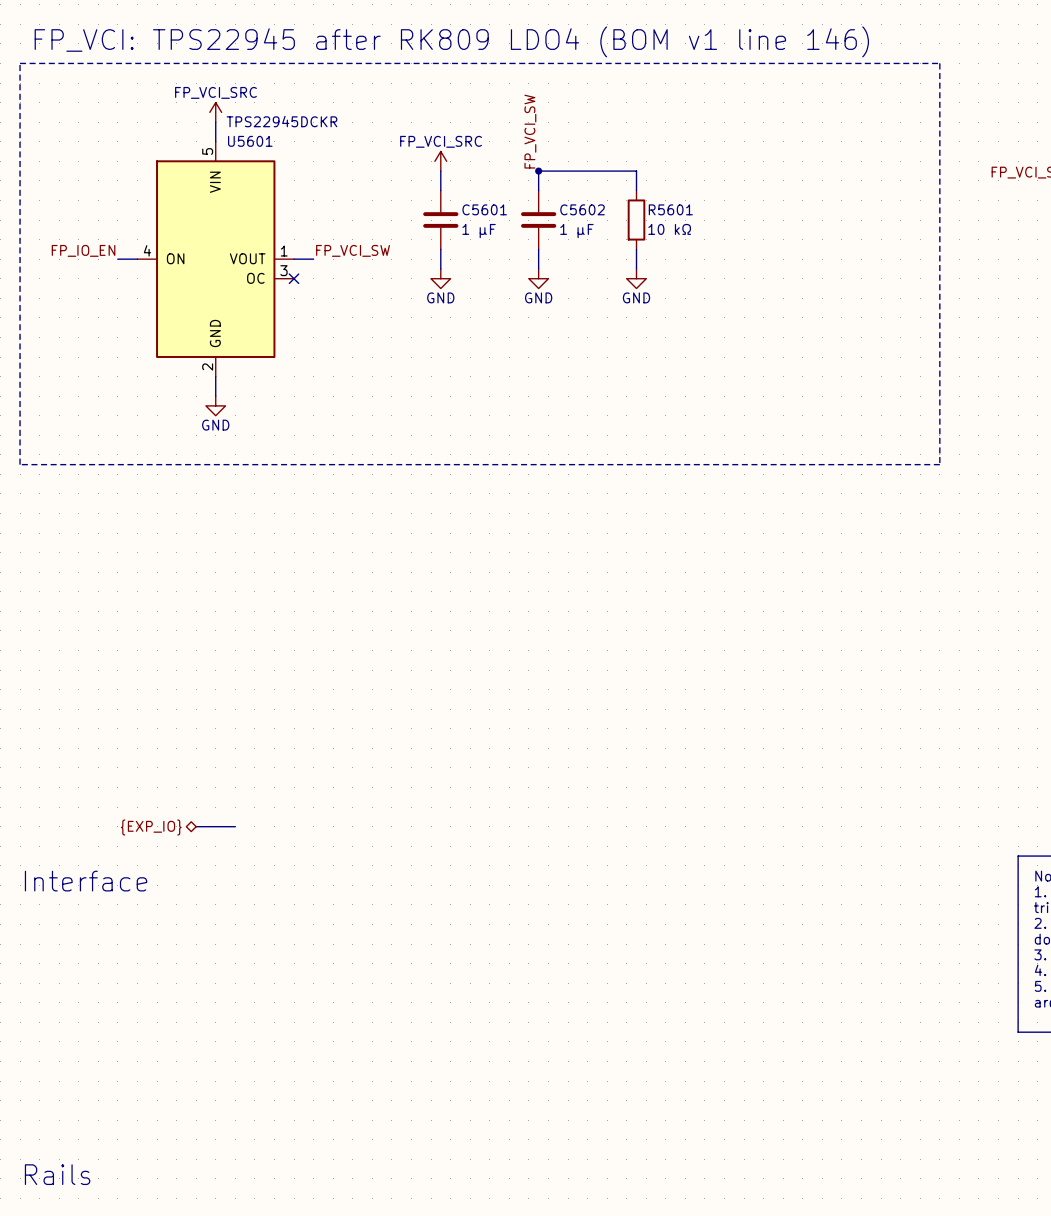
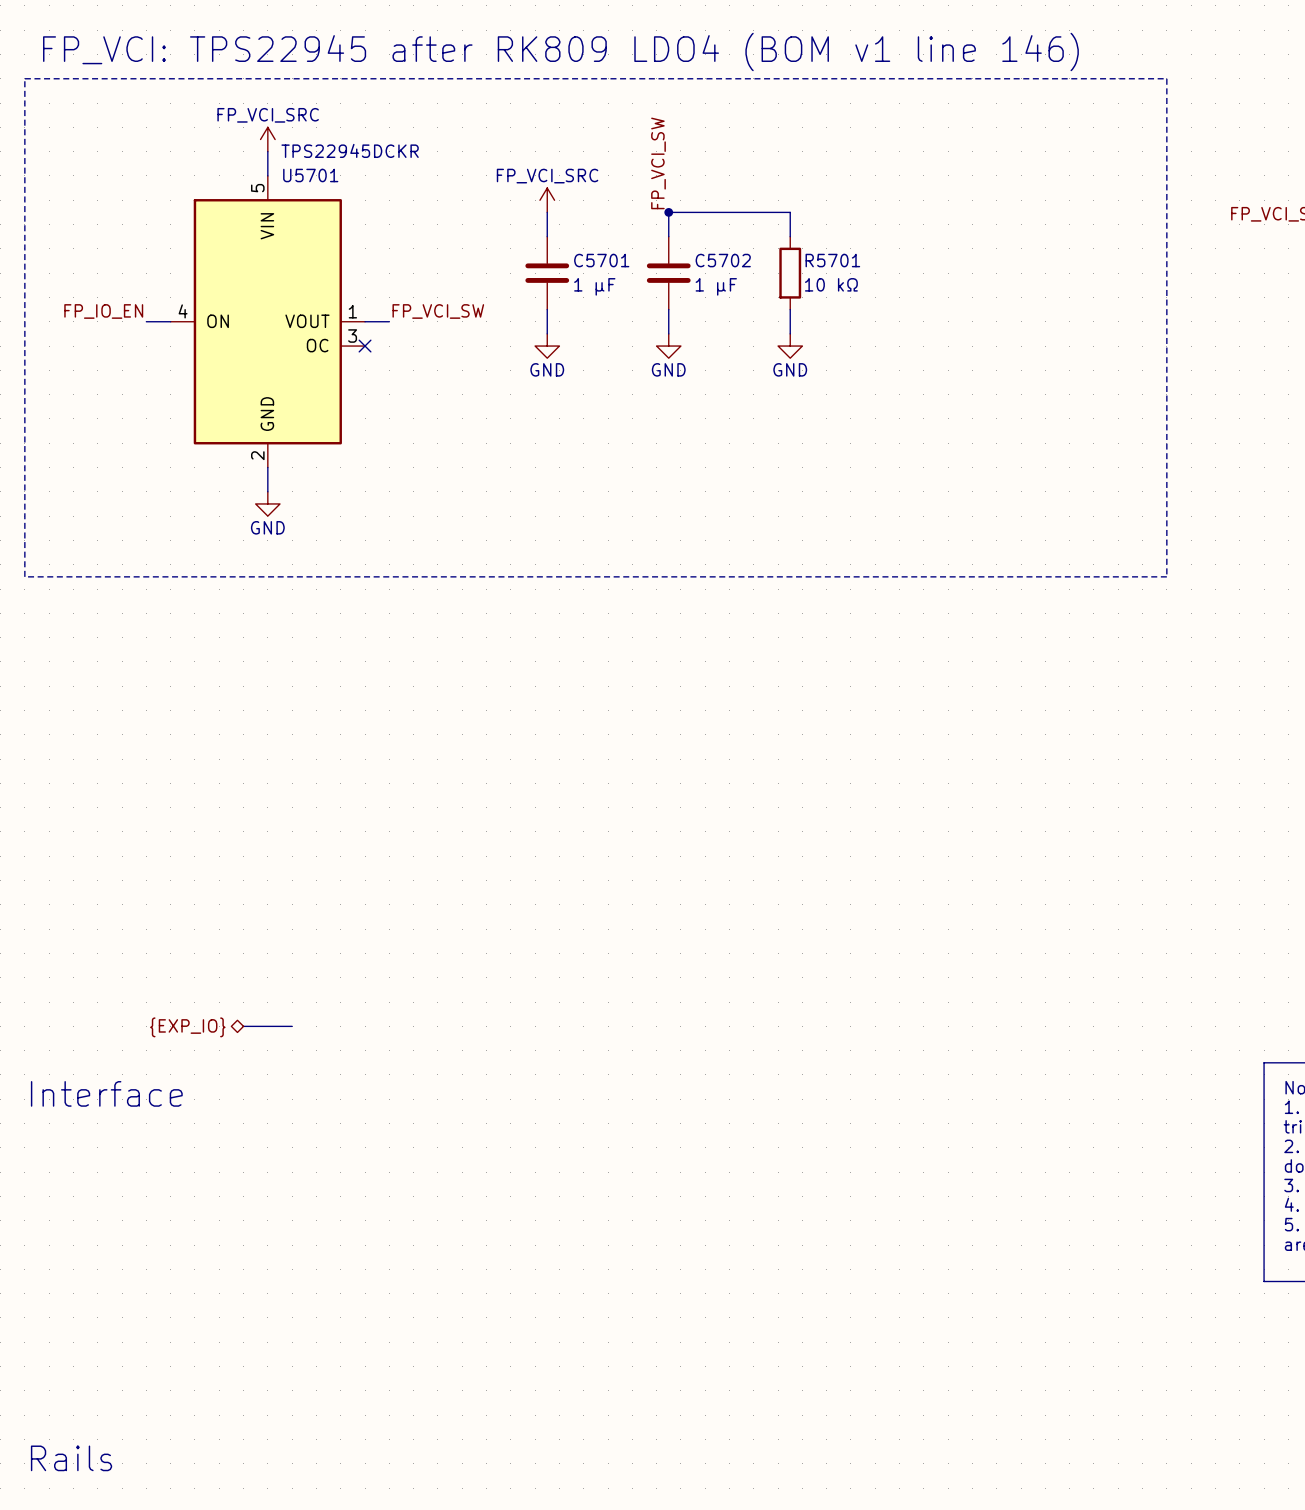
U5601 name: U5601 (250, 141) -> U5701 (310, 175)
C5601 name: C5601 (484, 209) -> C5701 (601, 260)
C5602 name: C5602 (582, 209) -> C5702 (723, 260)
R5601 name: R5601 (670, 209) -> R5701 (832, 260)

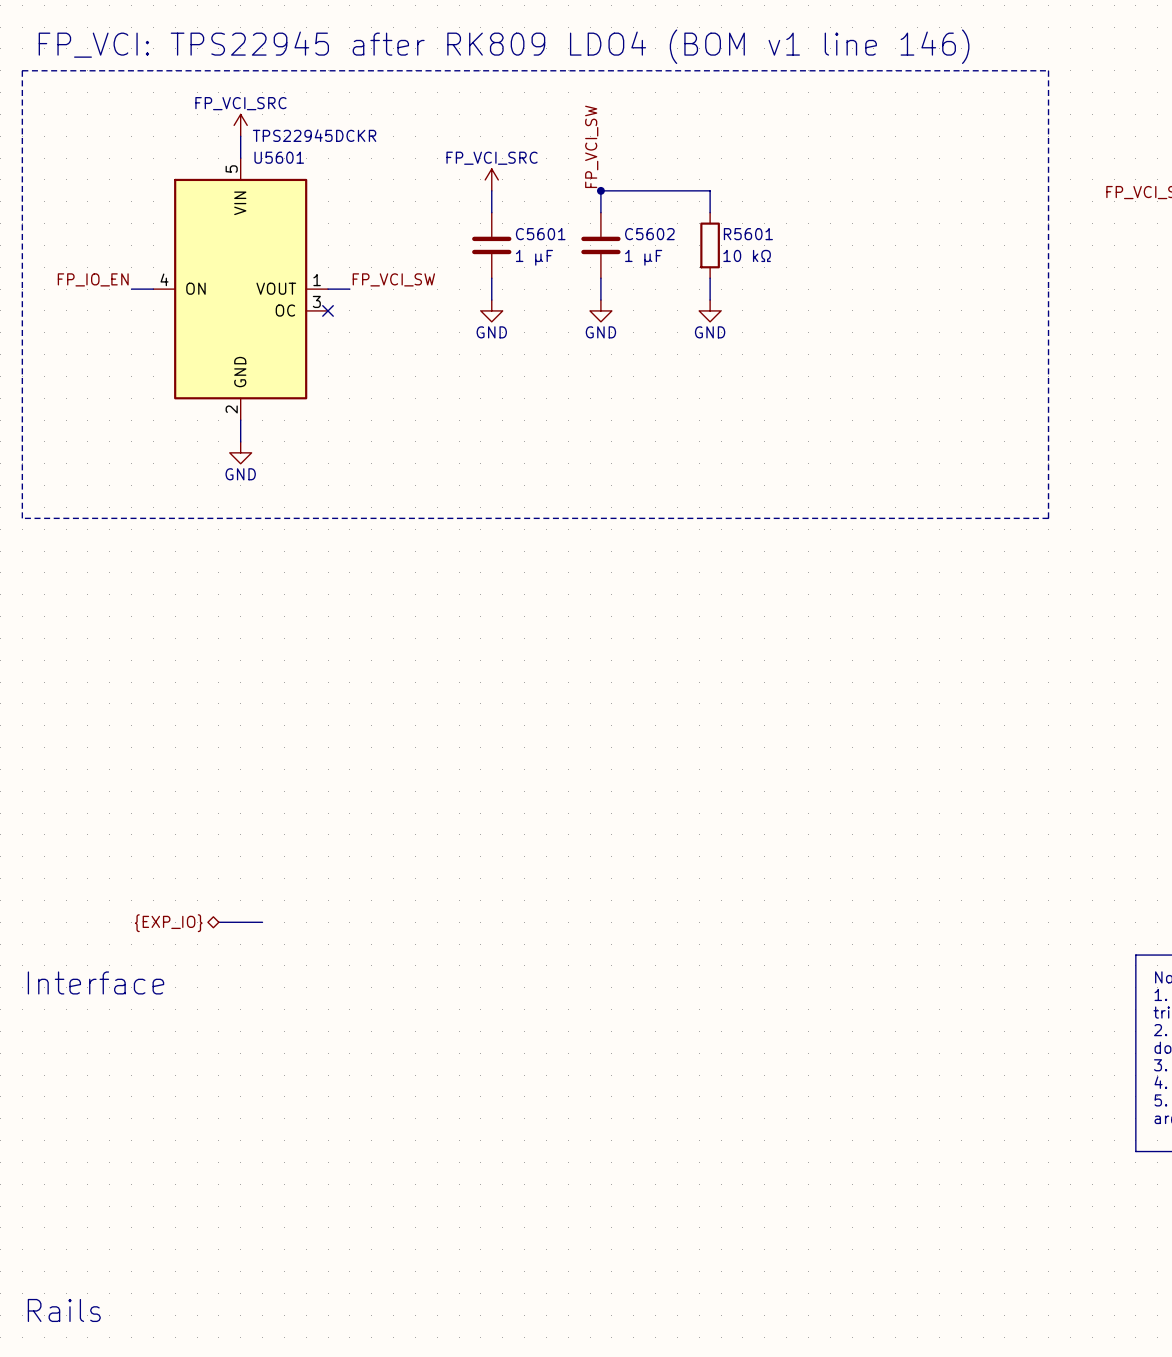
U5701 name: U5701 (310, 175) -> U5601 (279, 157)
C5701 name: C5701 (601, 260) -> C5601 (540, 234)
C5702 name: C5702 (723, 260) -> C5602 (649, 234)
R5701 name: R5701 (832, 260) -> R5601 (748, 234)

